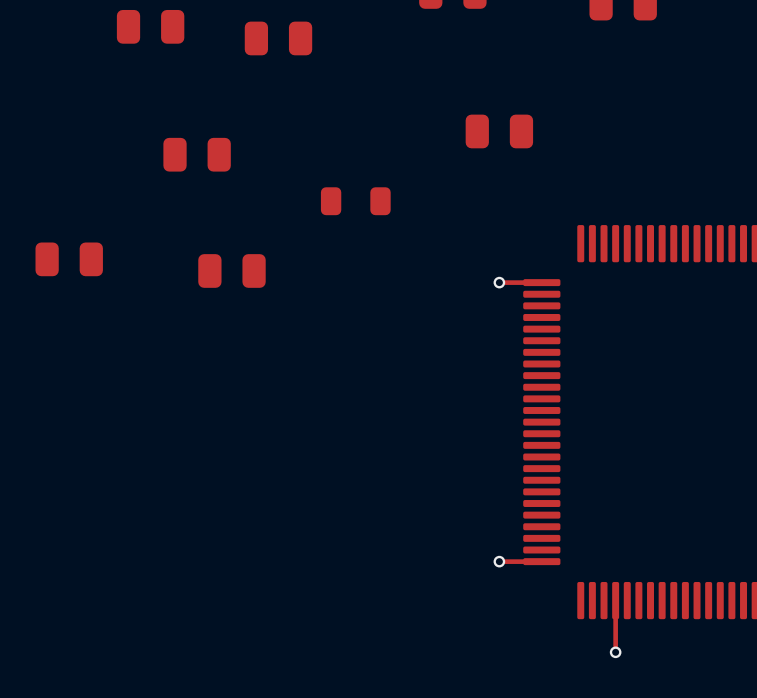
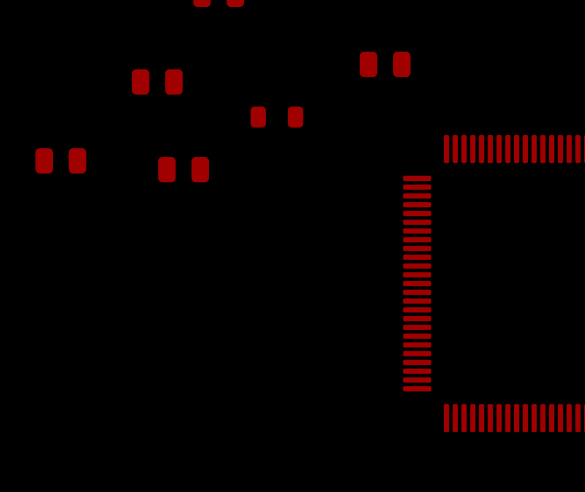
via: (499, 282) -> none
top track: (541, 282) (499, 282) -> none
via: (499, 561) -> none
top track: (541, 561) (499, 561) -> none
top track: (615, 600) (615, 652) -> none
via: (615, 652) -> none

